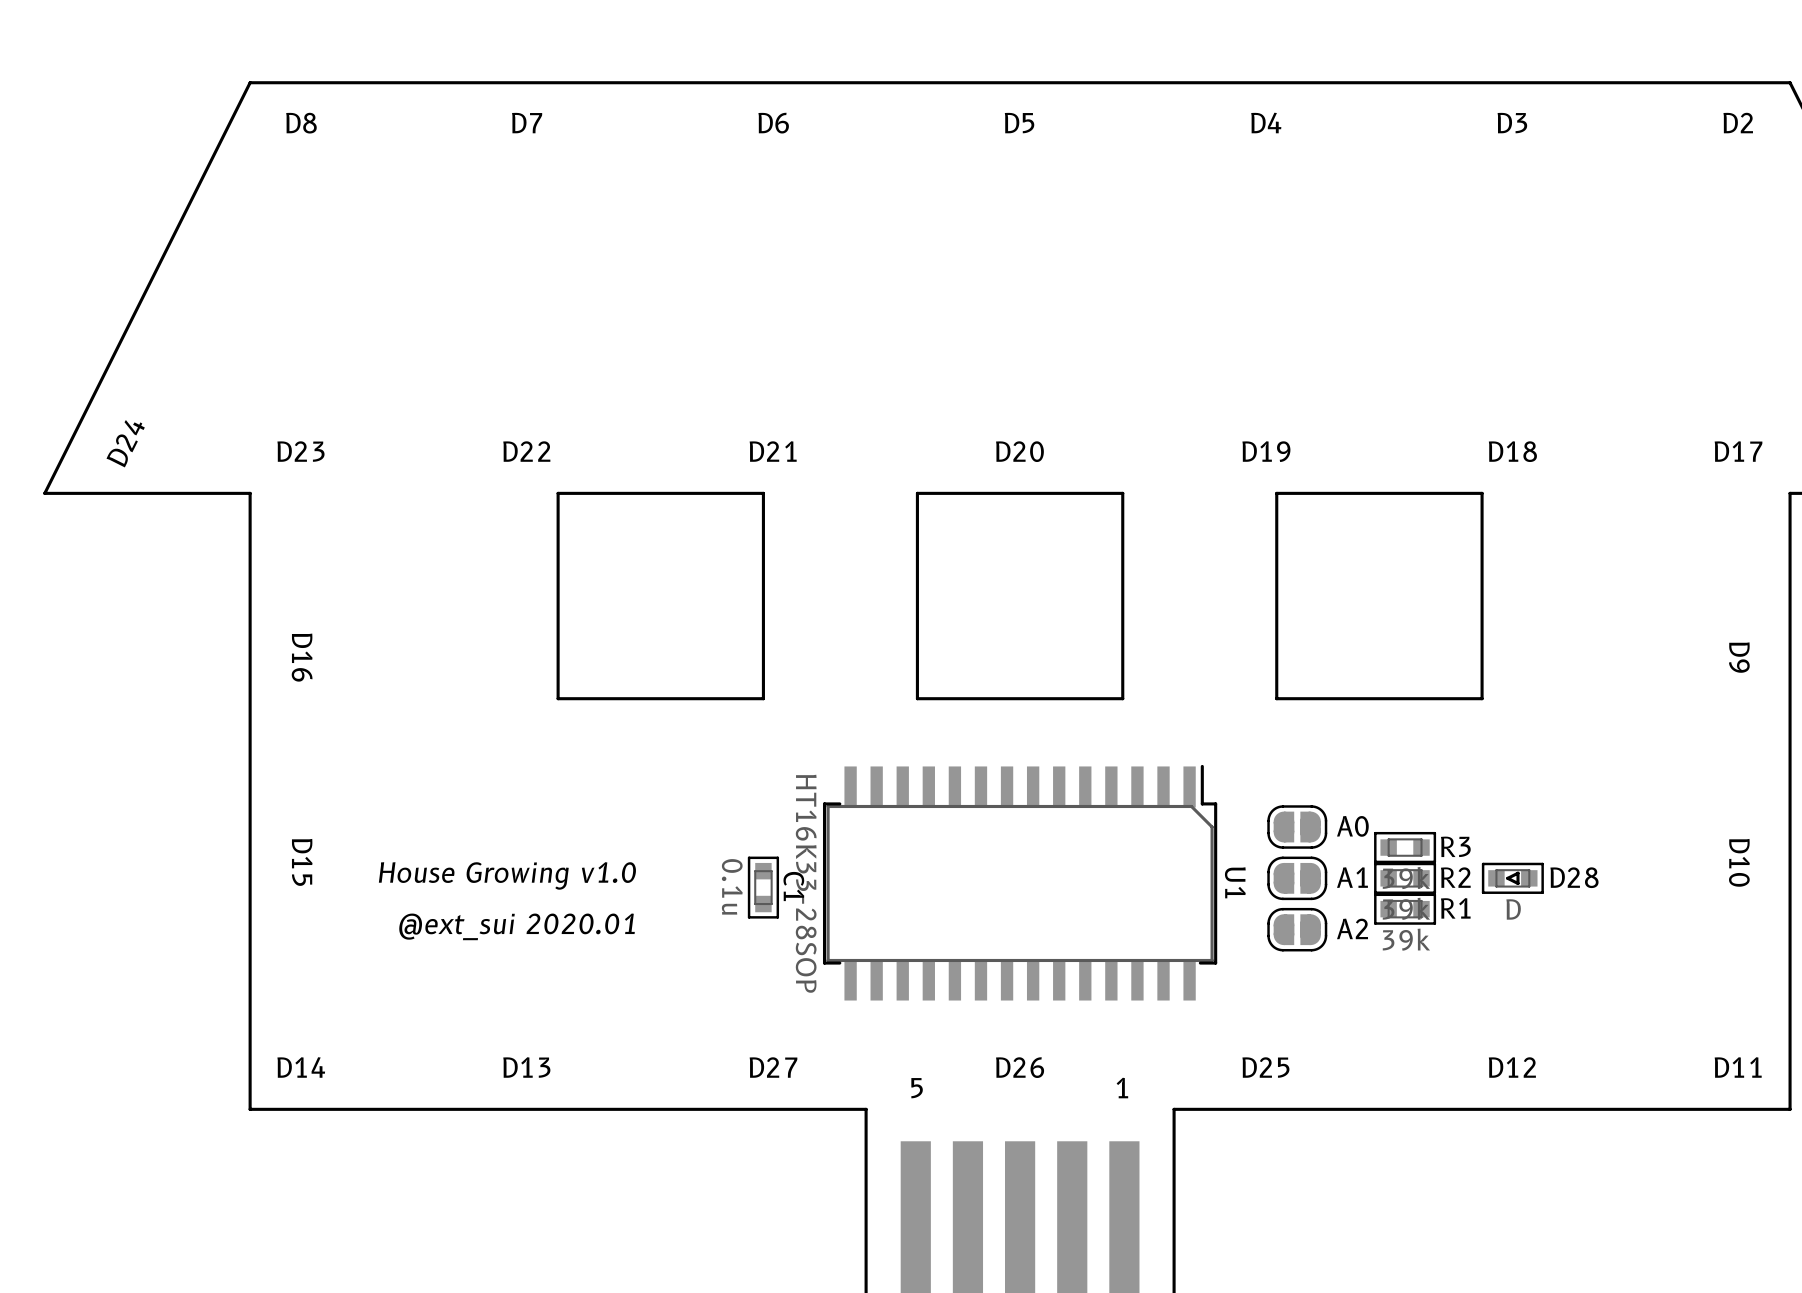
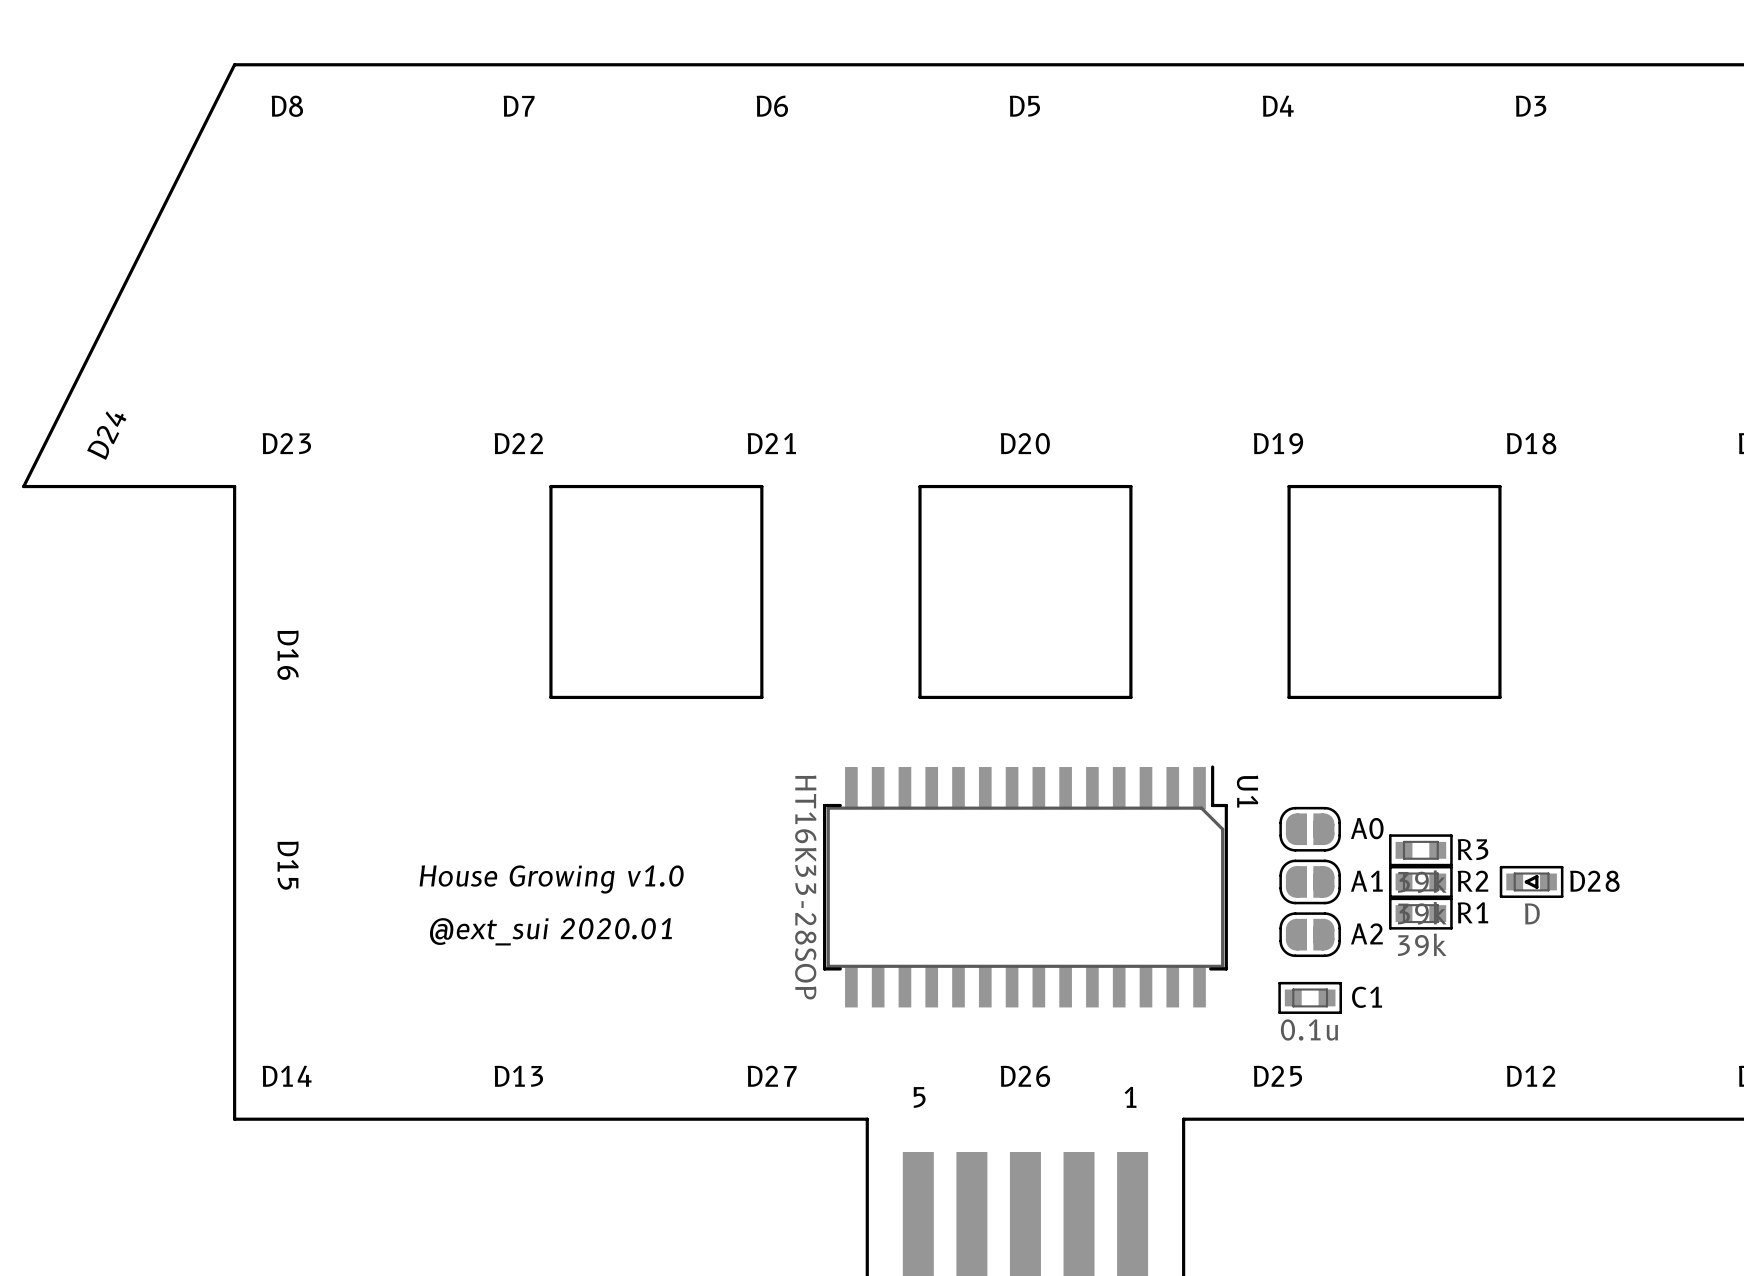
text position: House Growing v1.0 (507, 875) -> House Growing v1.0 (551, 879)
U1 name position: U1 (1235, 882) -> U1 (1247, 791)
C1 value position: 0.1u (732, 886) -> 0.1u (1309, 1029)
C1 rotation: 0° (763, 887) -> 90° clockwise (1310, 997)
C1 position: (763, 887) -> (1310, 997)
text position: @ext_sui 2020.01 (517, 926) -> @ext_sui 2020.01 (550, 931)

